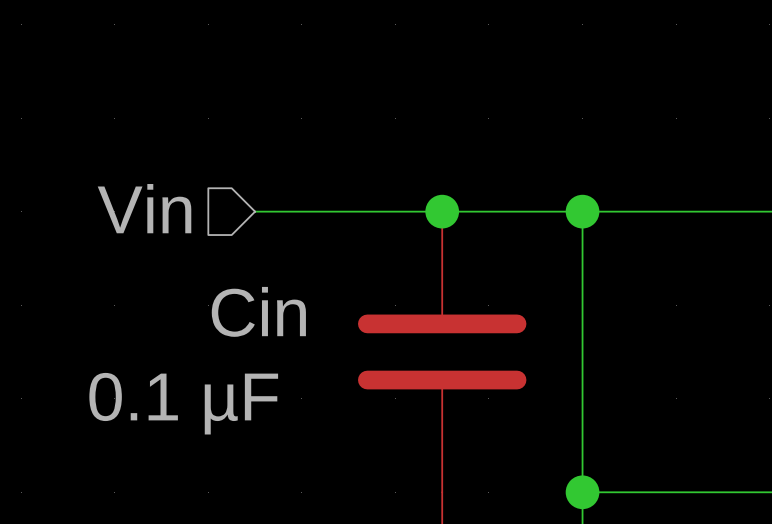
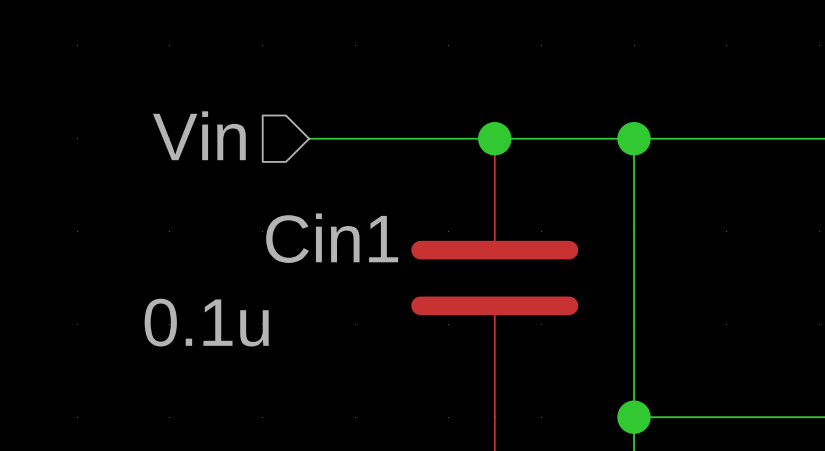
Cin name: Cin (258, 311) -> Cin1 (332, 238)
Cin value: 0.1 µF (183, 403) -> 0.1u (206, 322)

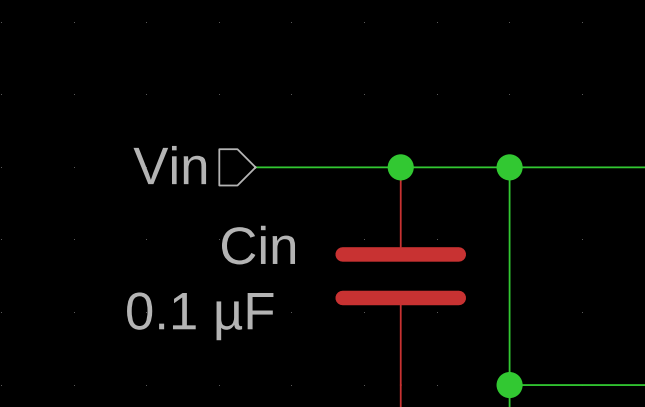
Cin1 name: Cin1 (332, 238) -> Cin (258, 245)
Cin1 value: 0.1u (206, 322) -> 0.1 µF (200, 316)

